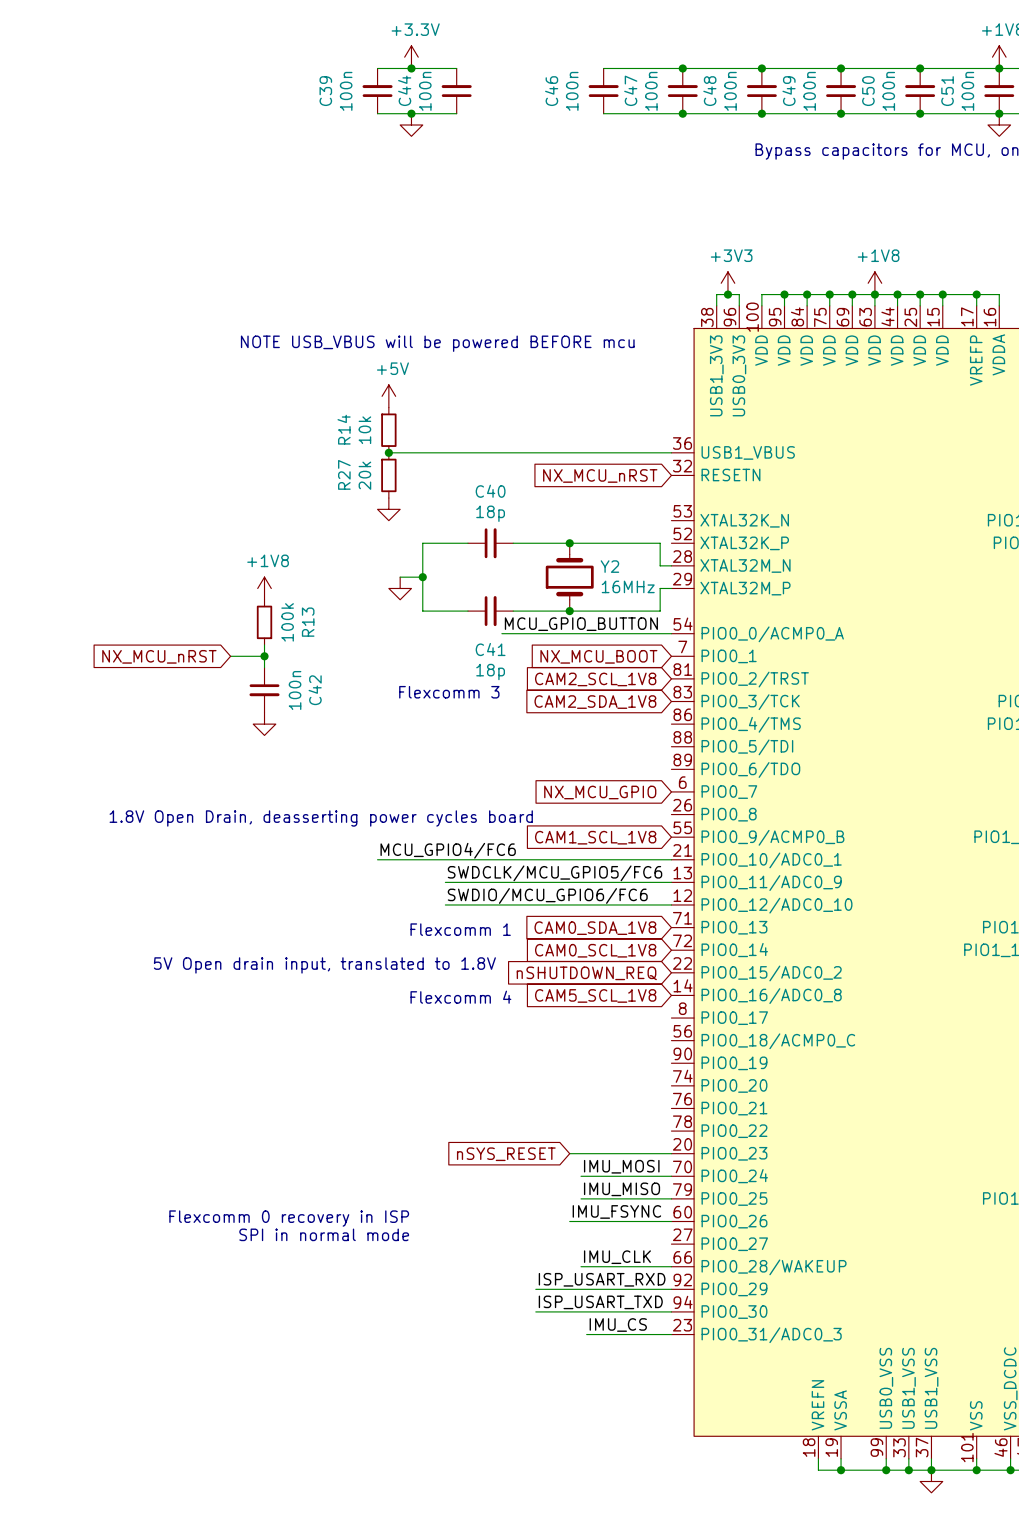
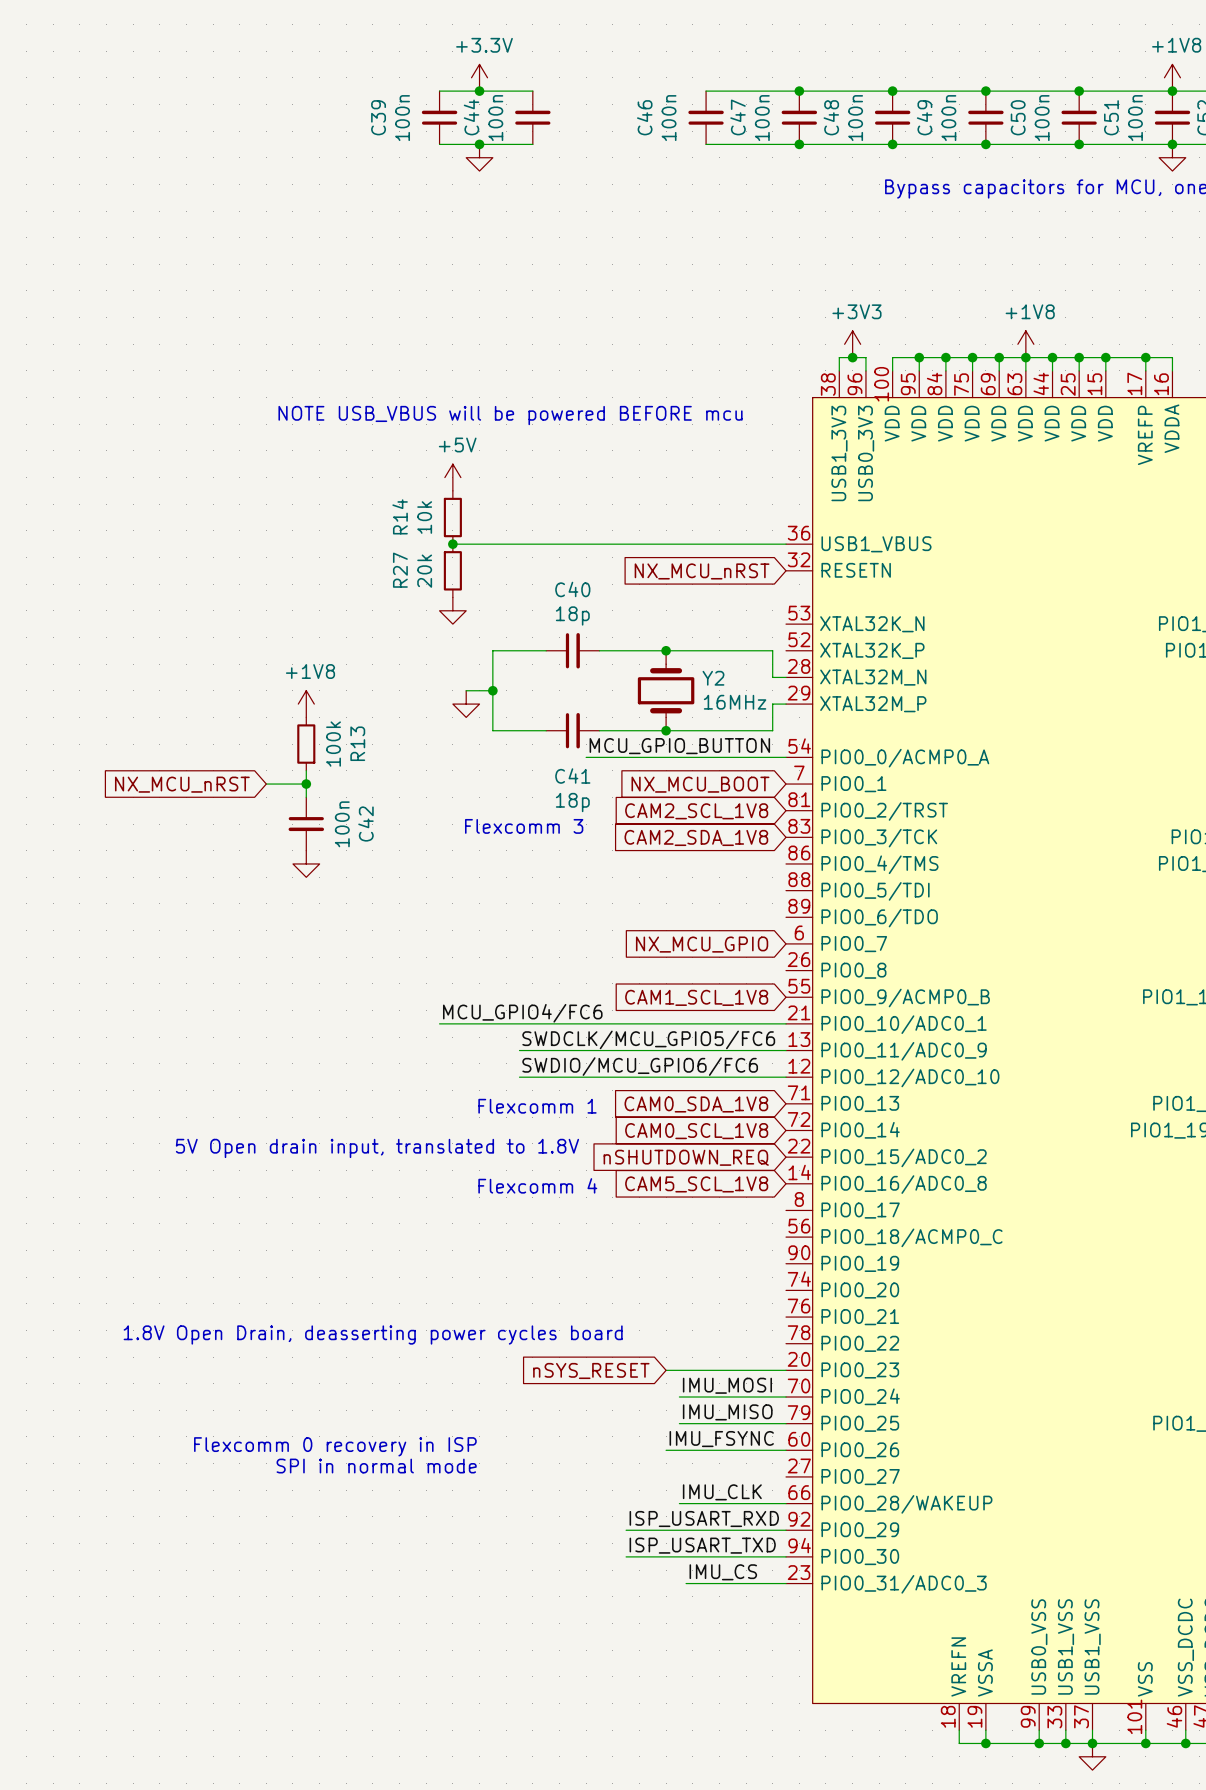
text: 1.8V Open Drain, deasserting power cycles board (321, 818) -> none
text: none -> 1.8V Open Drain, deasserting power cycles board (373, 1335)

